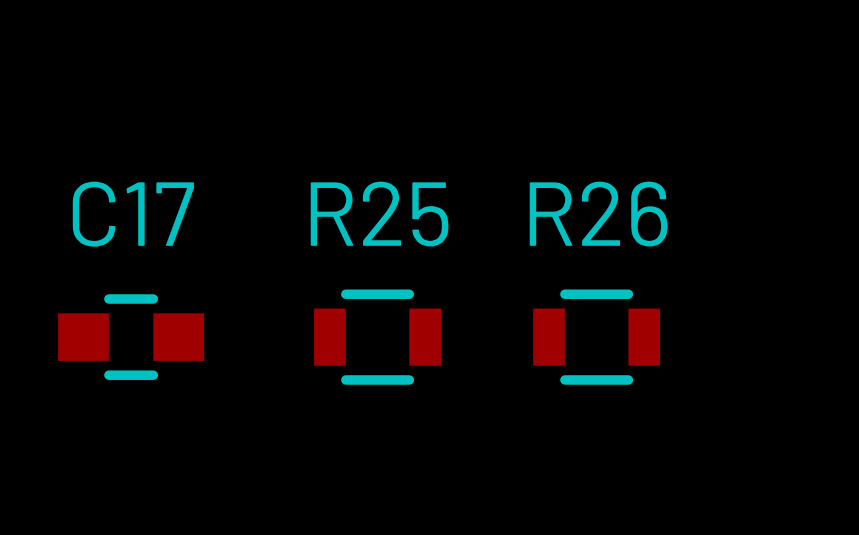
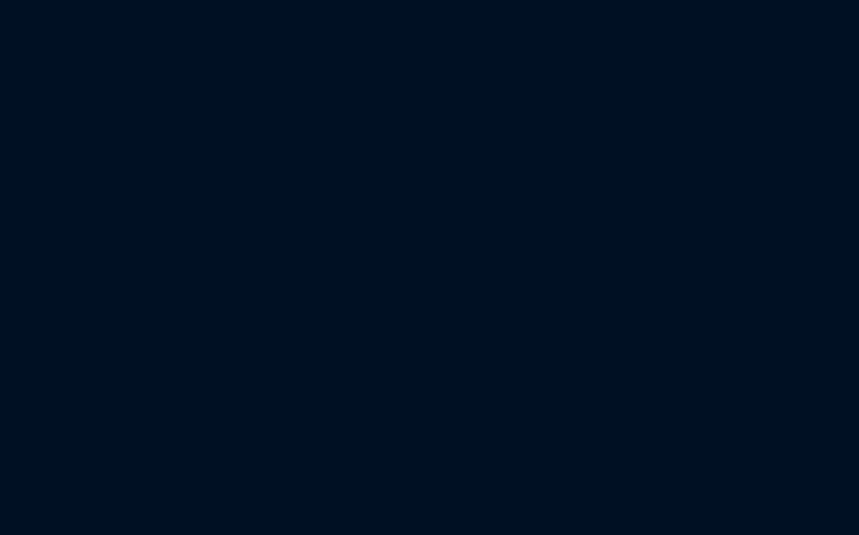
C17: (131, 337) -> none
R25: (377, 337) -> none
R26: (596, 337) -> none

